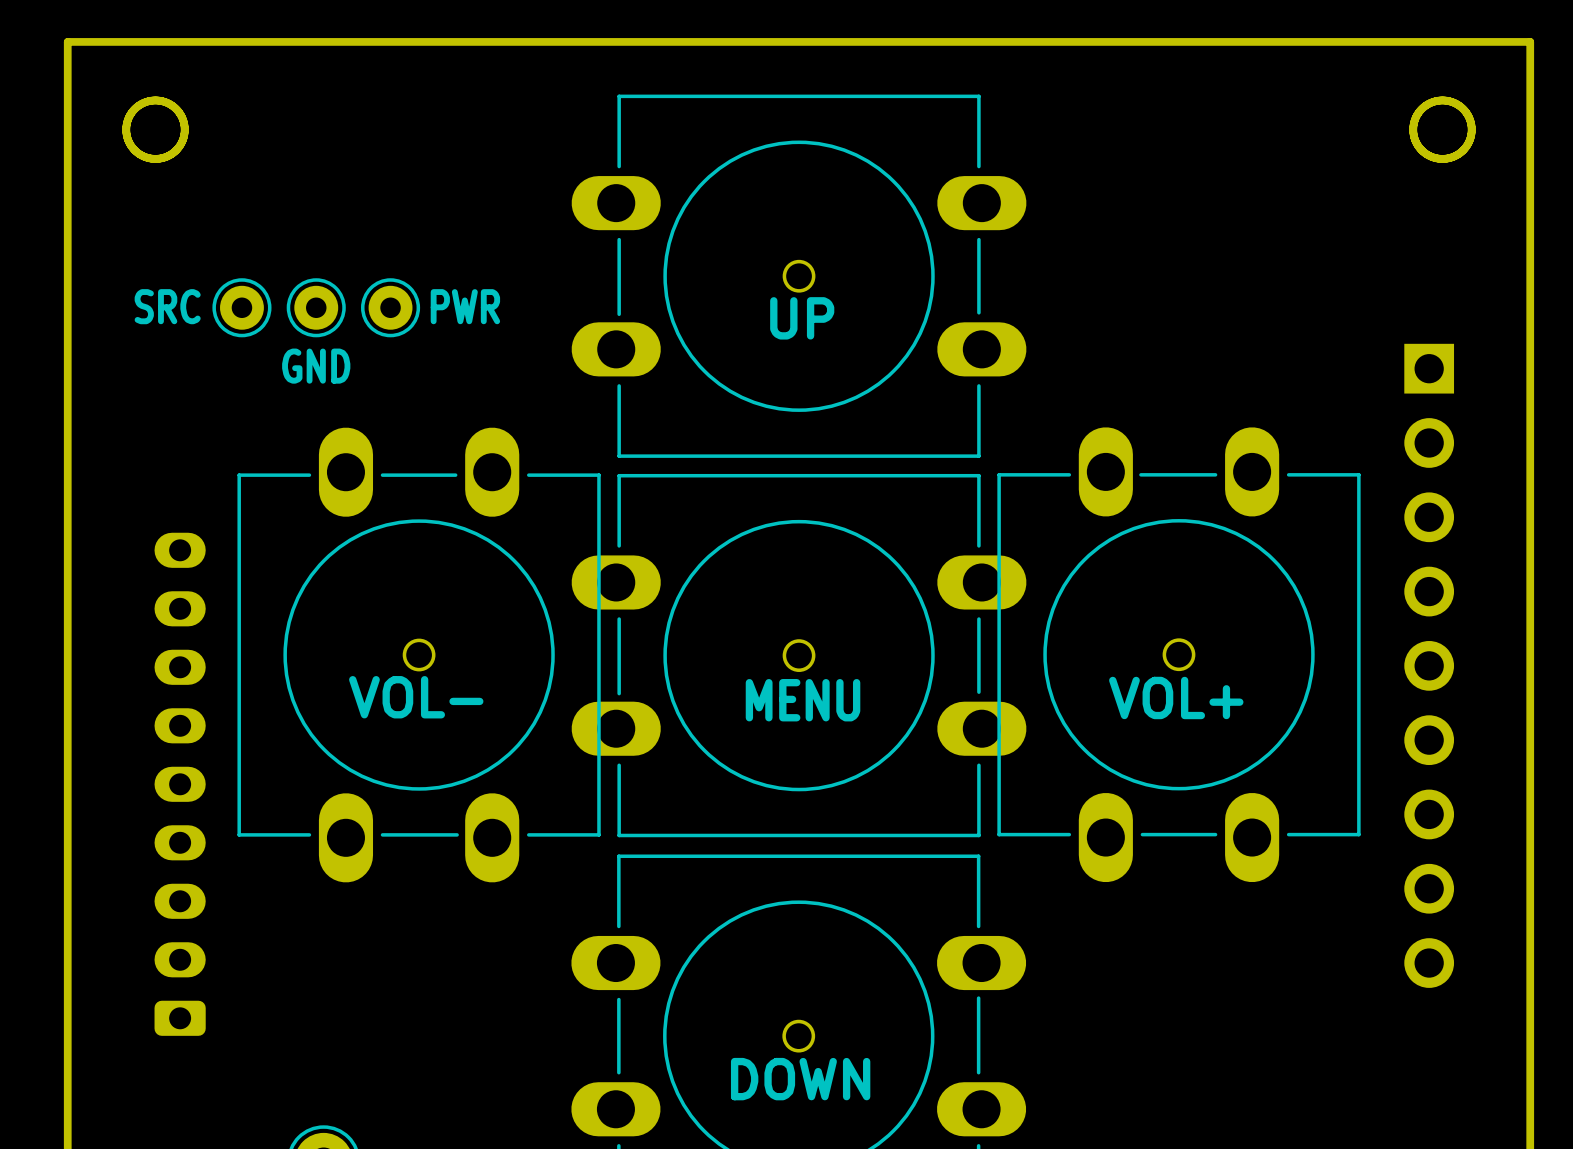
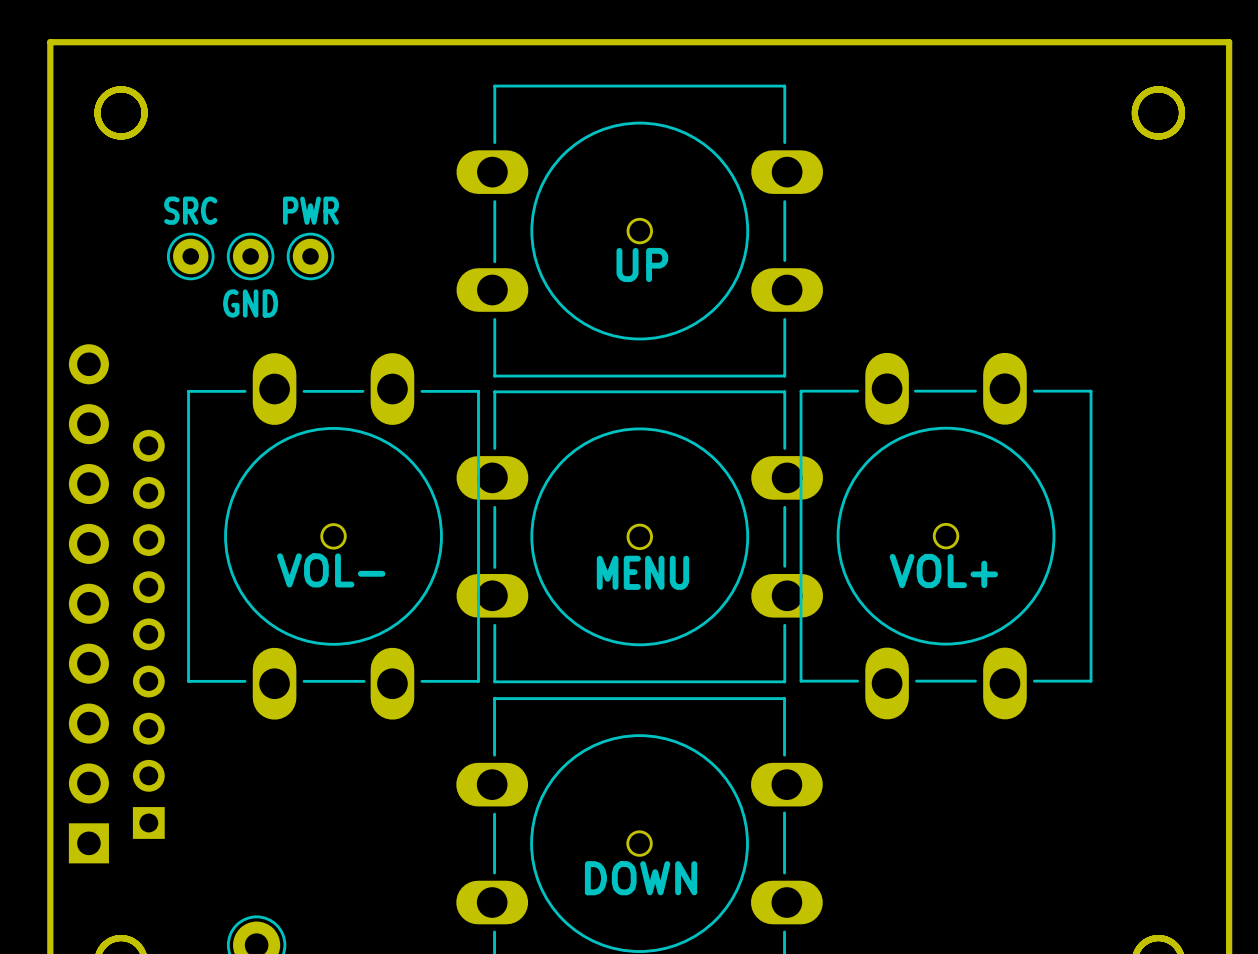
text position: SRC (167, 306) -> SRC (190, 210)
text position: PWR (465, 306) -> PWR (310, 210)
part footprint: [154, 532, 206, 1036] -> [132, 429, 165, 839]
part: (1429, 665) -> none
part: none -> (88, 603)

